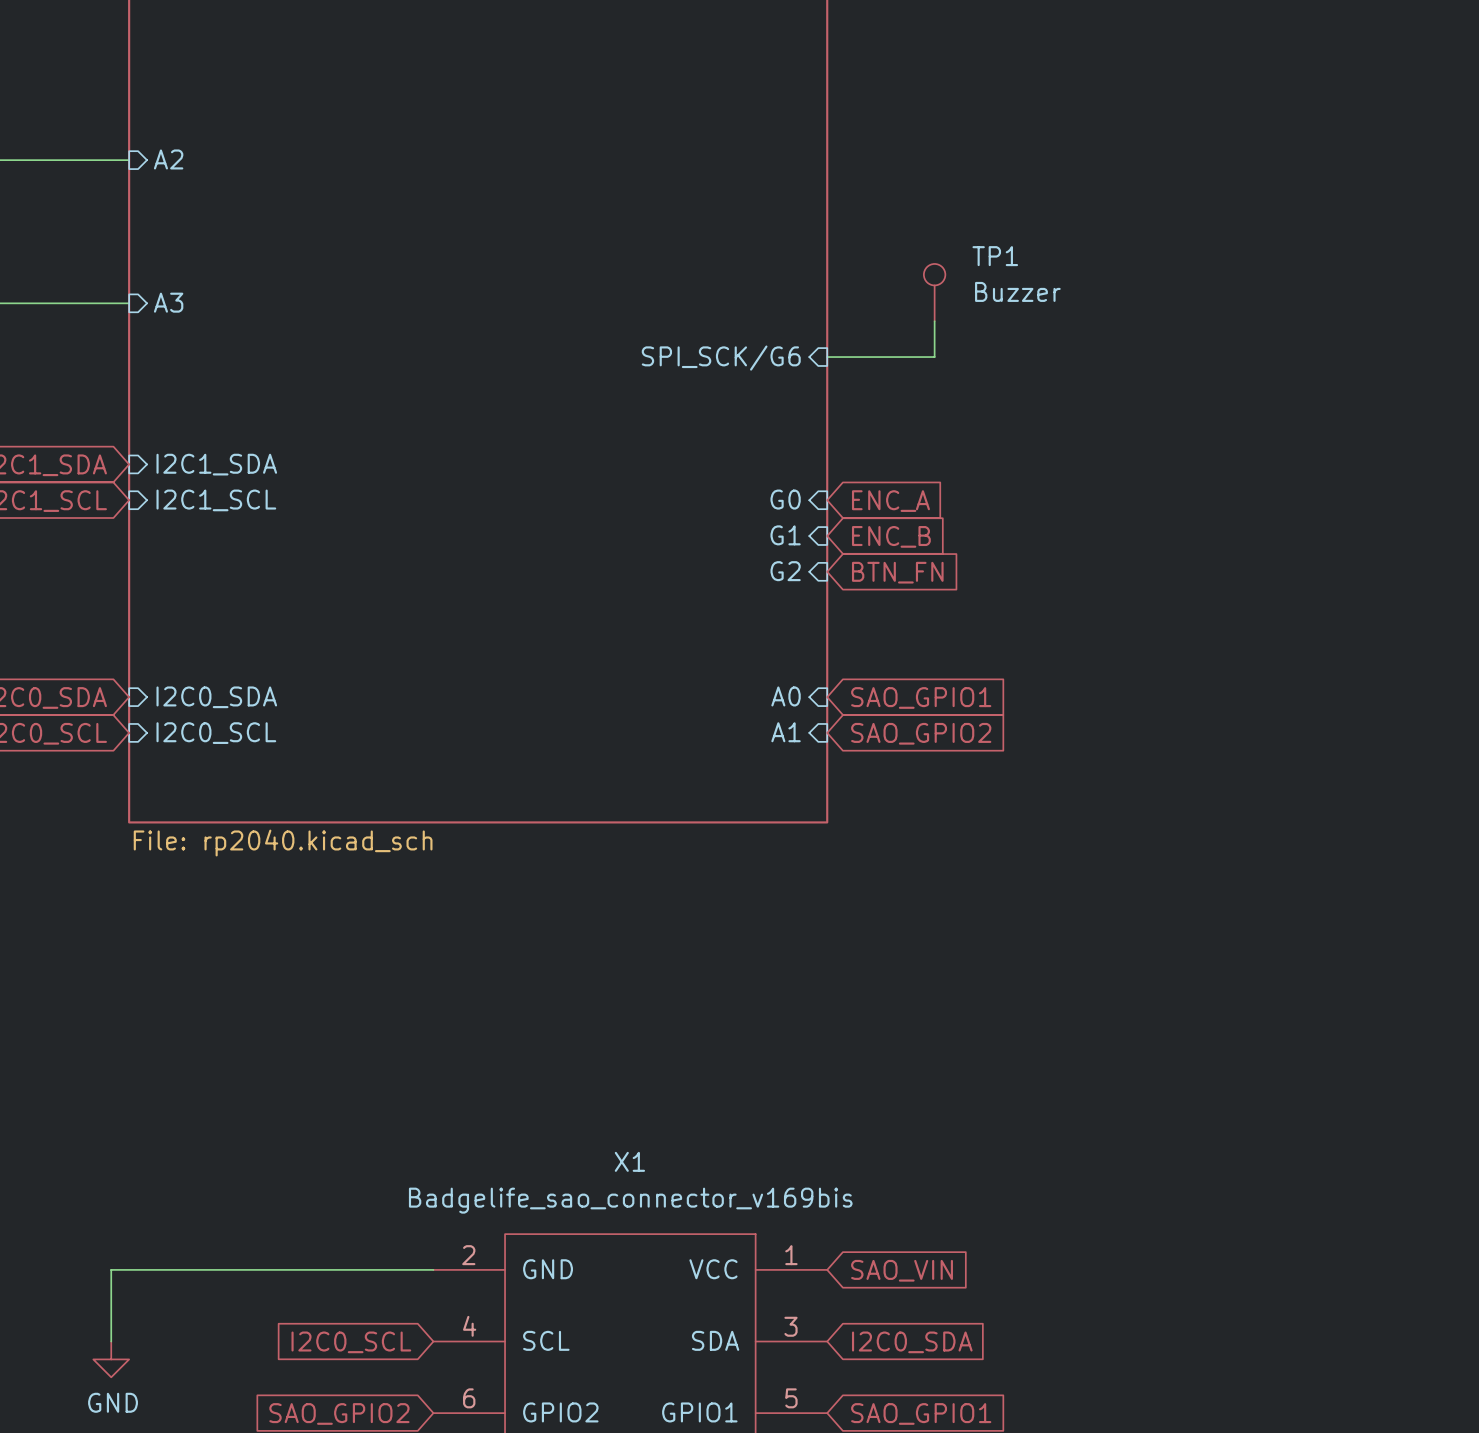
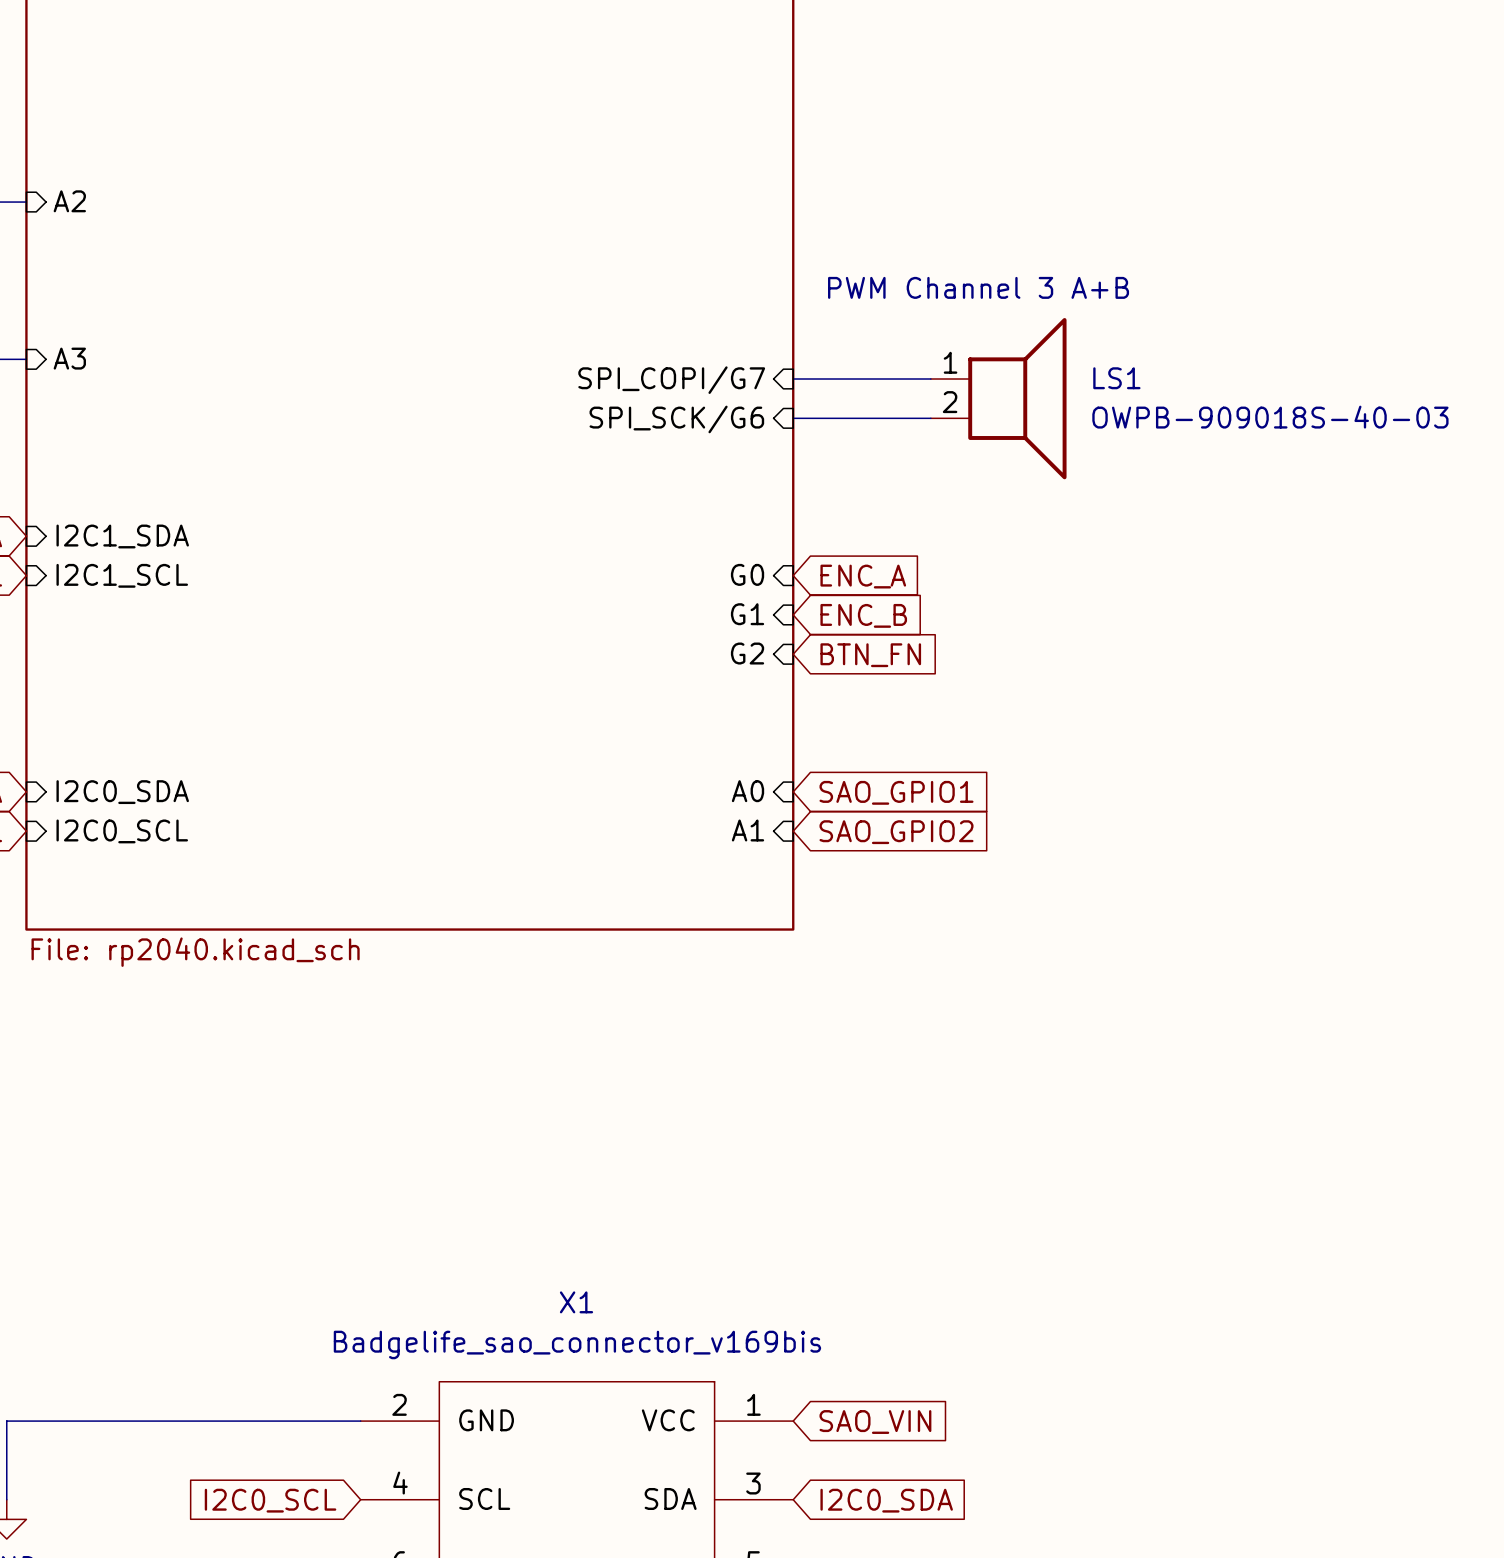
text: none -> PWM Channel 3 A+B (978, 287)
TP1: Buzzer (934, 292) -> none
wire: none -> (793, 379) (930, 379)
wire: (934, 321) (934, 357) -> (930, 418) (911, 418)
sheet pin: none -> SPI_COPI/G7 (671, 380)
LS1: none -> OWPB-909018S-40-03 (998, 398)

